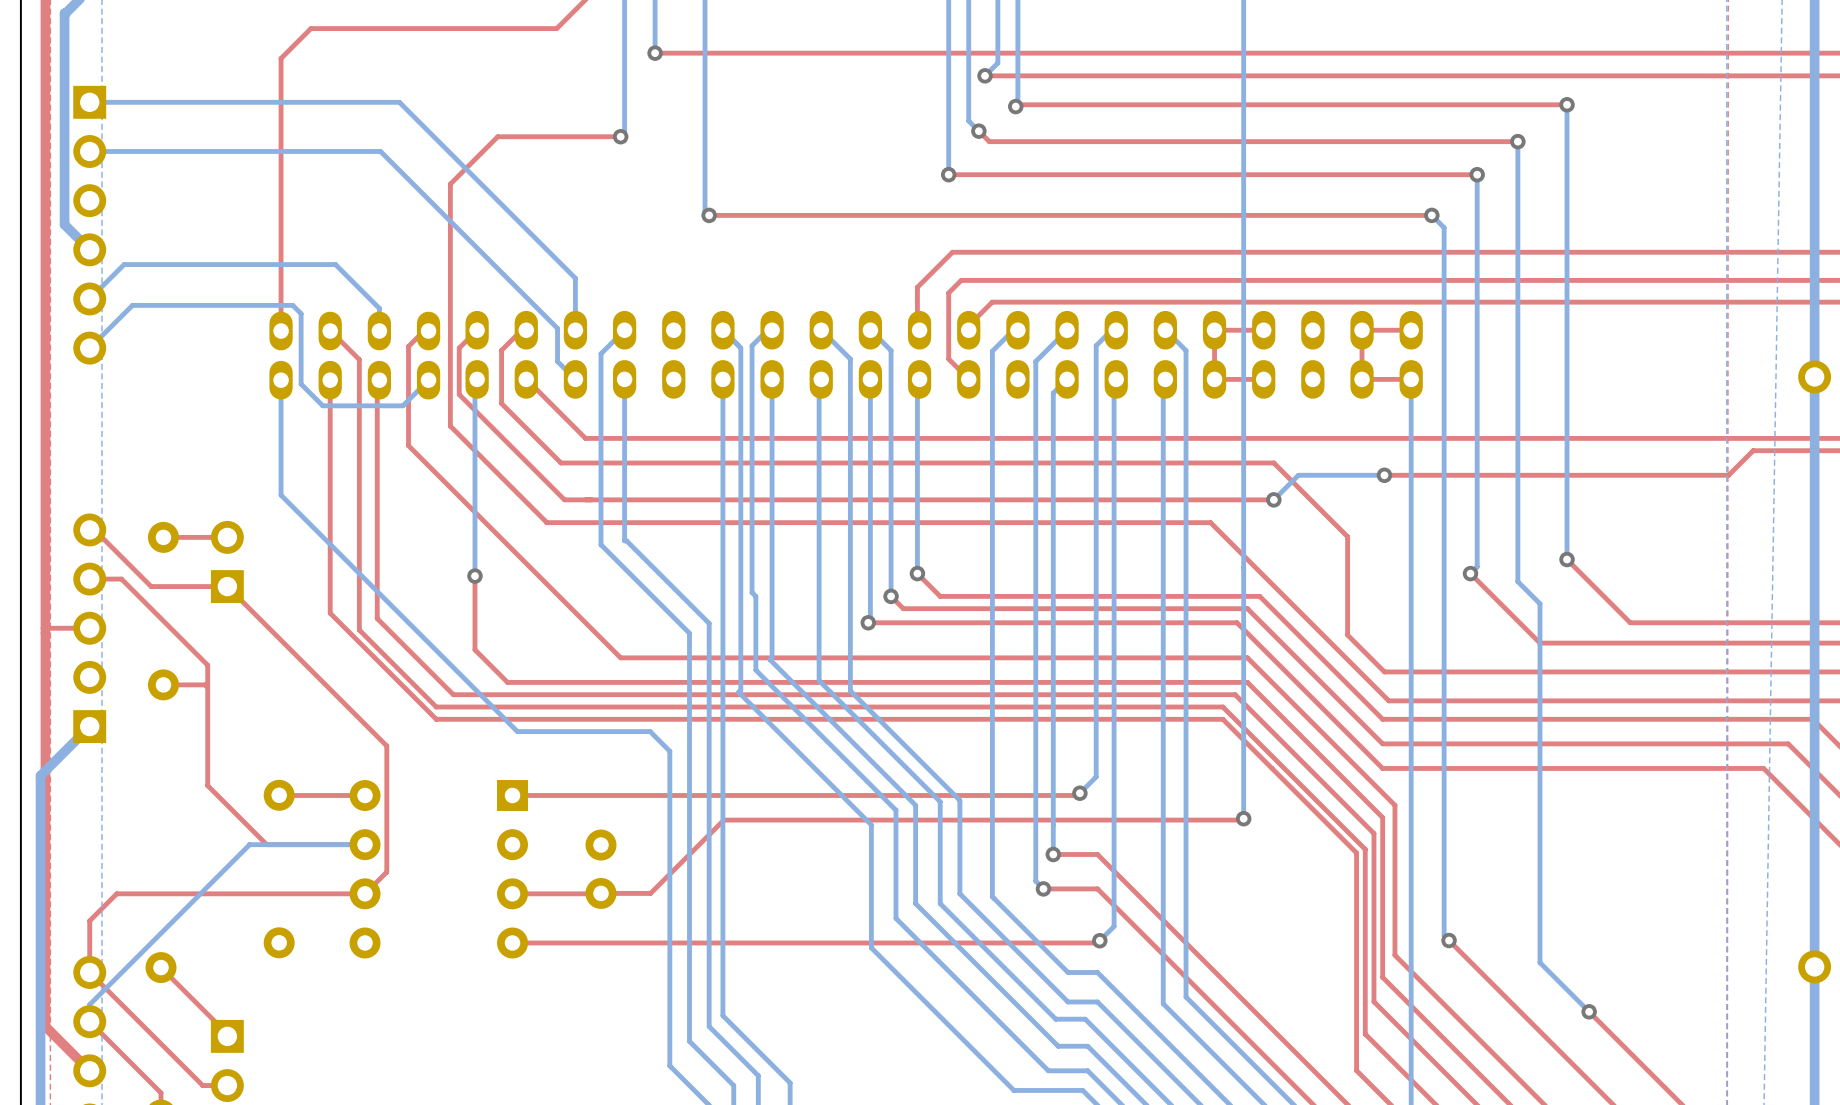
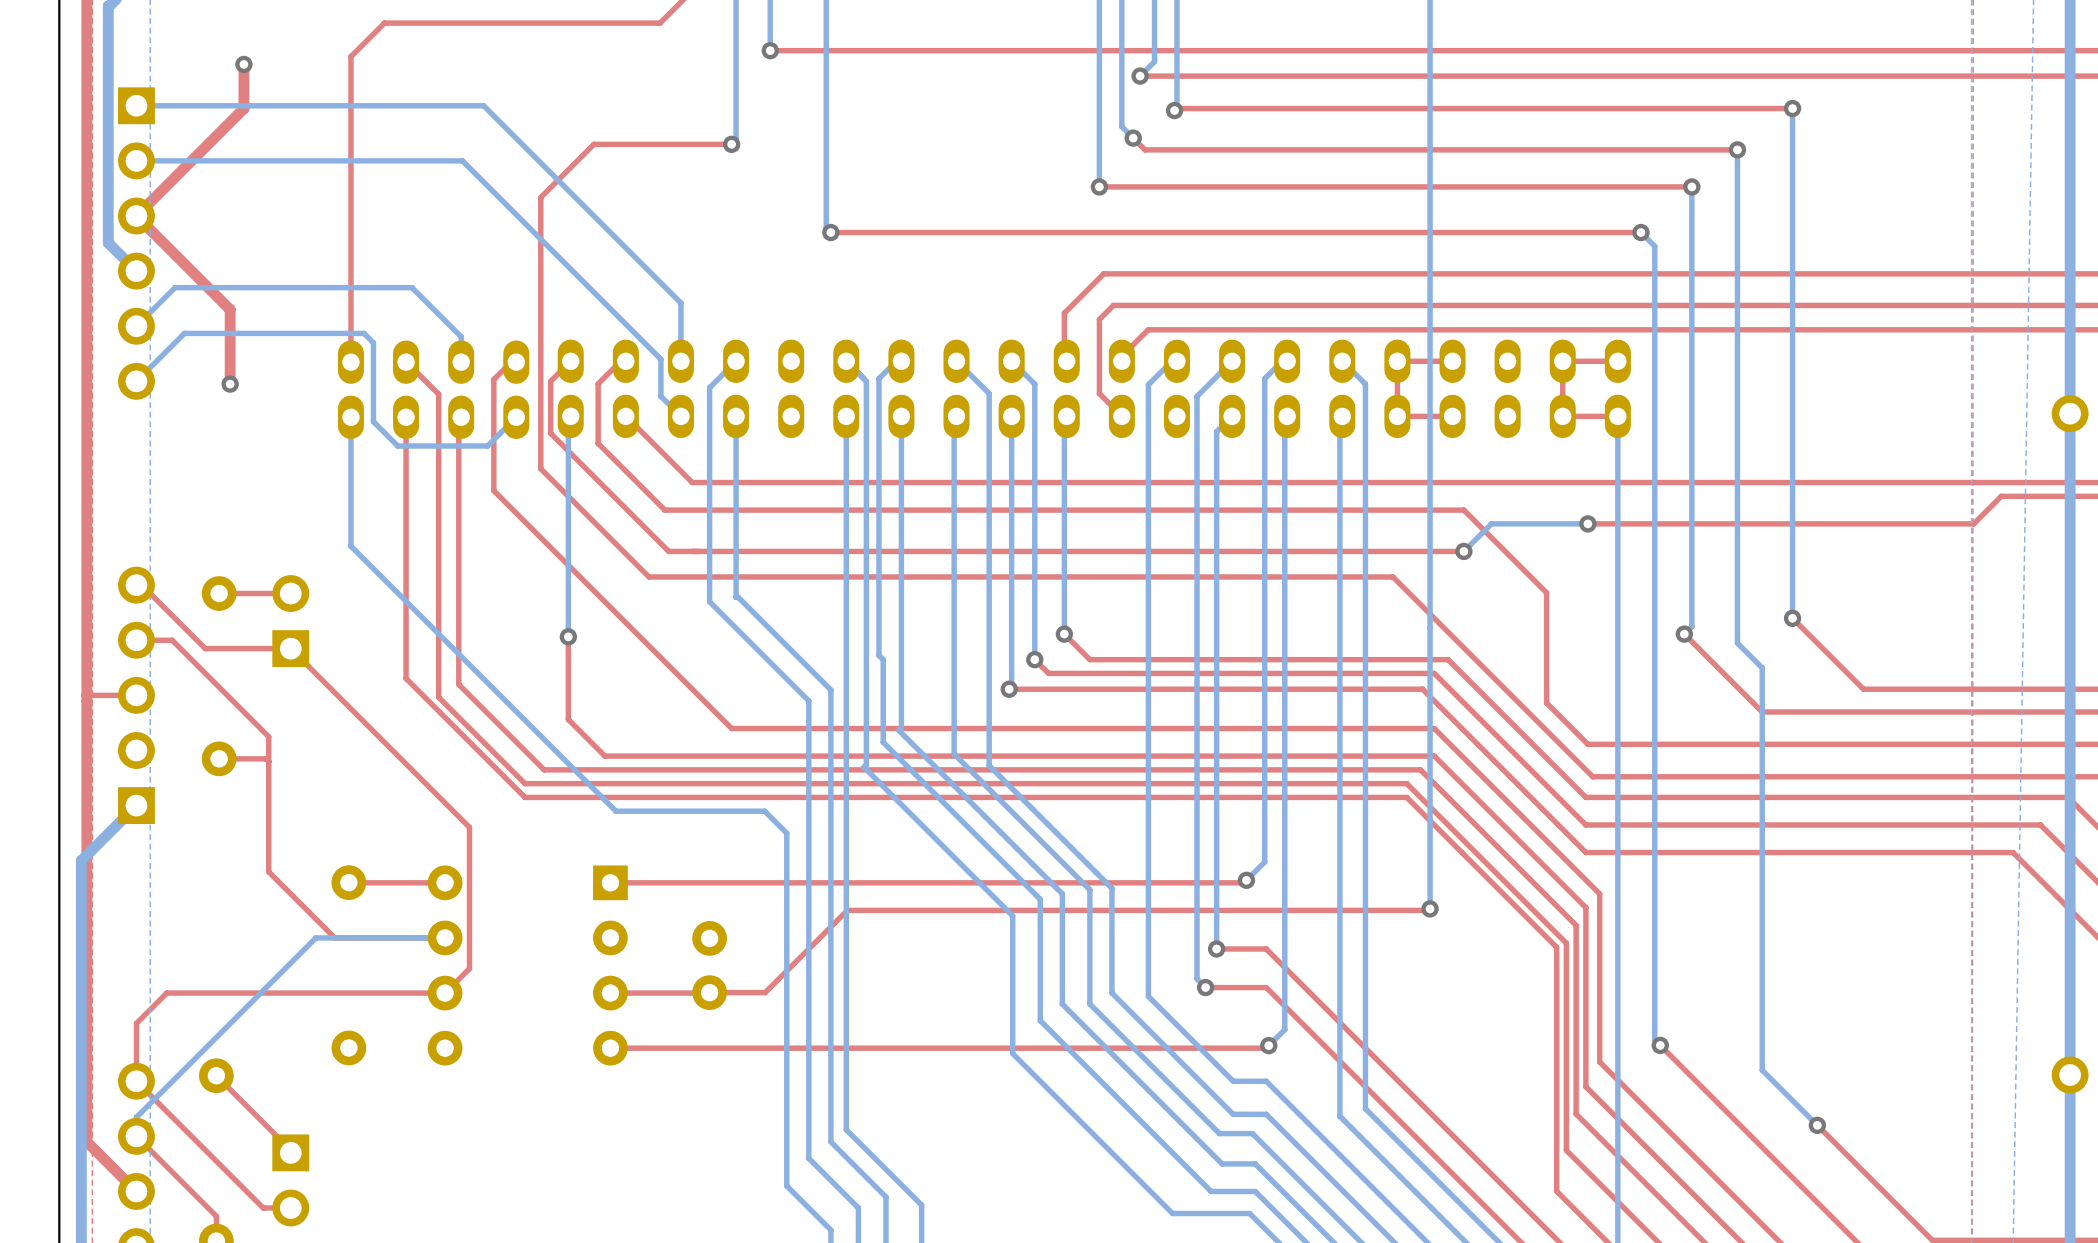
top track: none -> (243, 64) (243, 108) (136, 216) (230, 309) (230, 384)
via: none -> (243, 64)
via: none -> (230, 384)

